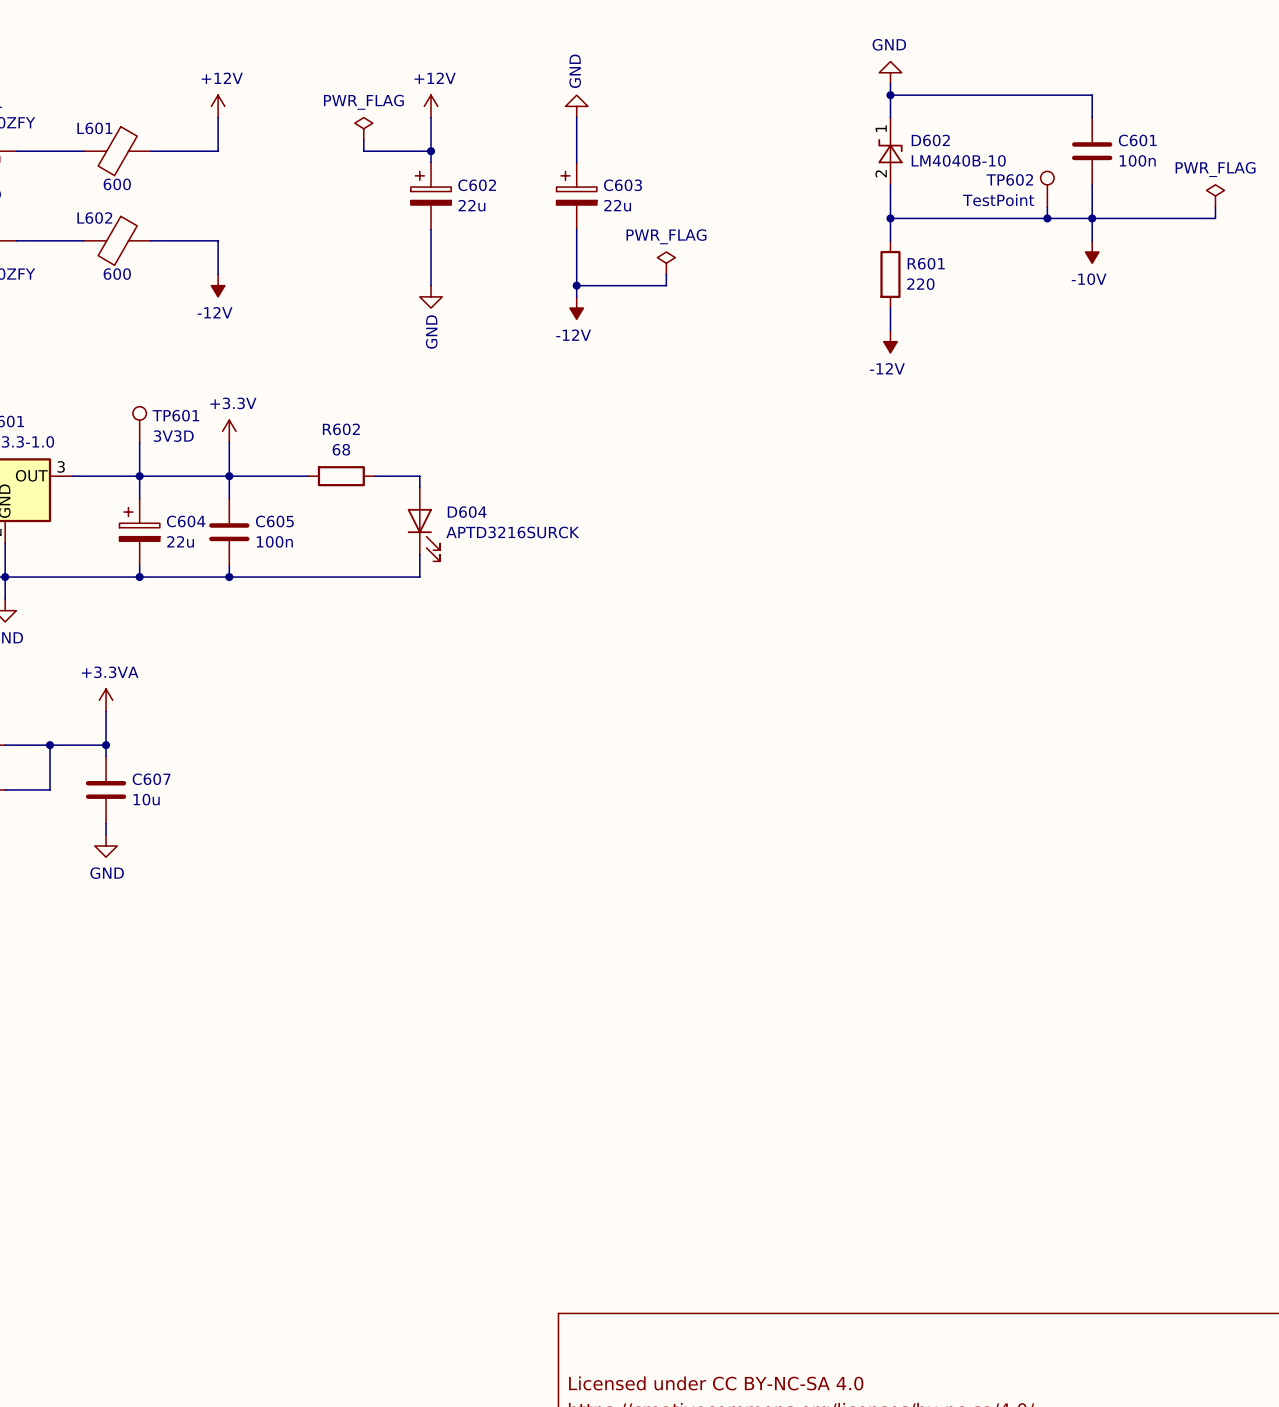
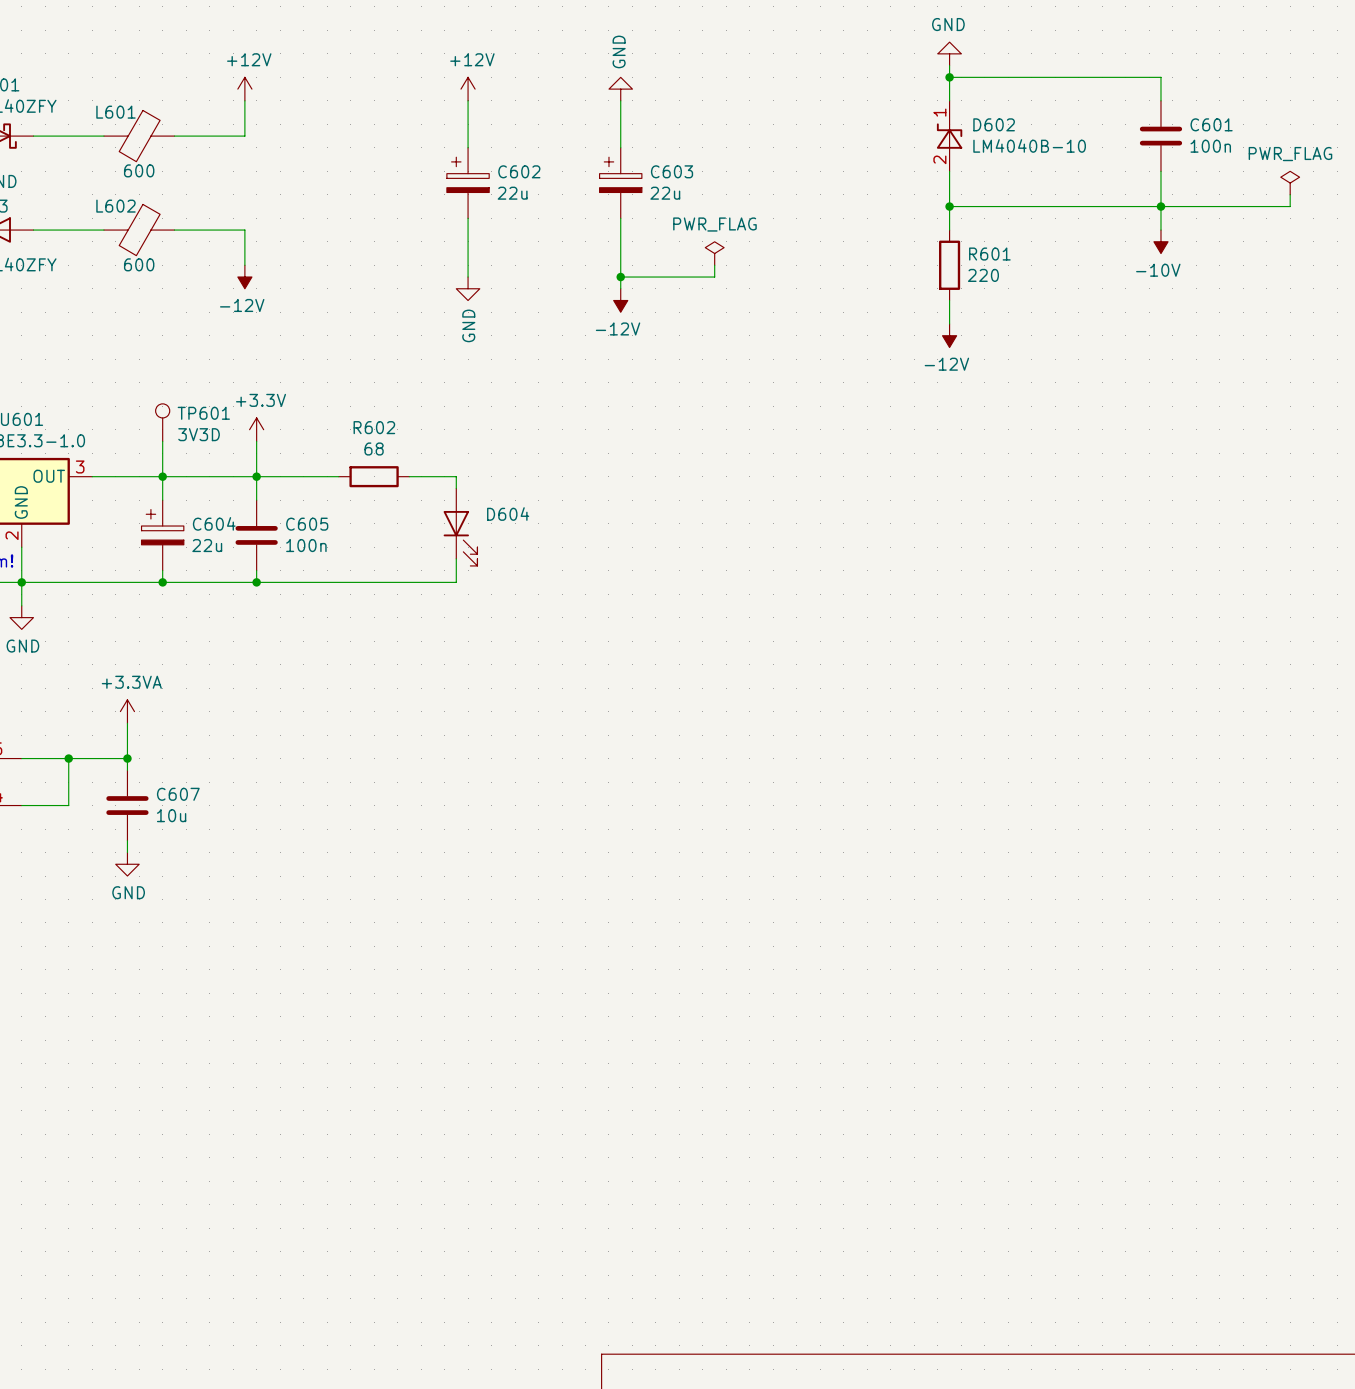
power symbol: PWR_FLAG (363, 128) -> none
wire: (363, 139) (363, 151) (431, 151) -> none
junction: (431, 151) -> none
TP602: TestPoint (1047, 189) -> none
wire: (1047, 207) (1047, 218) -> none
junction: (1047, 218) -> none
D604 value: APTD3216SURCK (512, 532) -> none

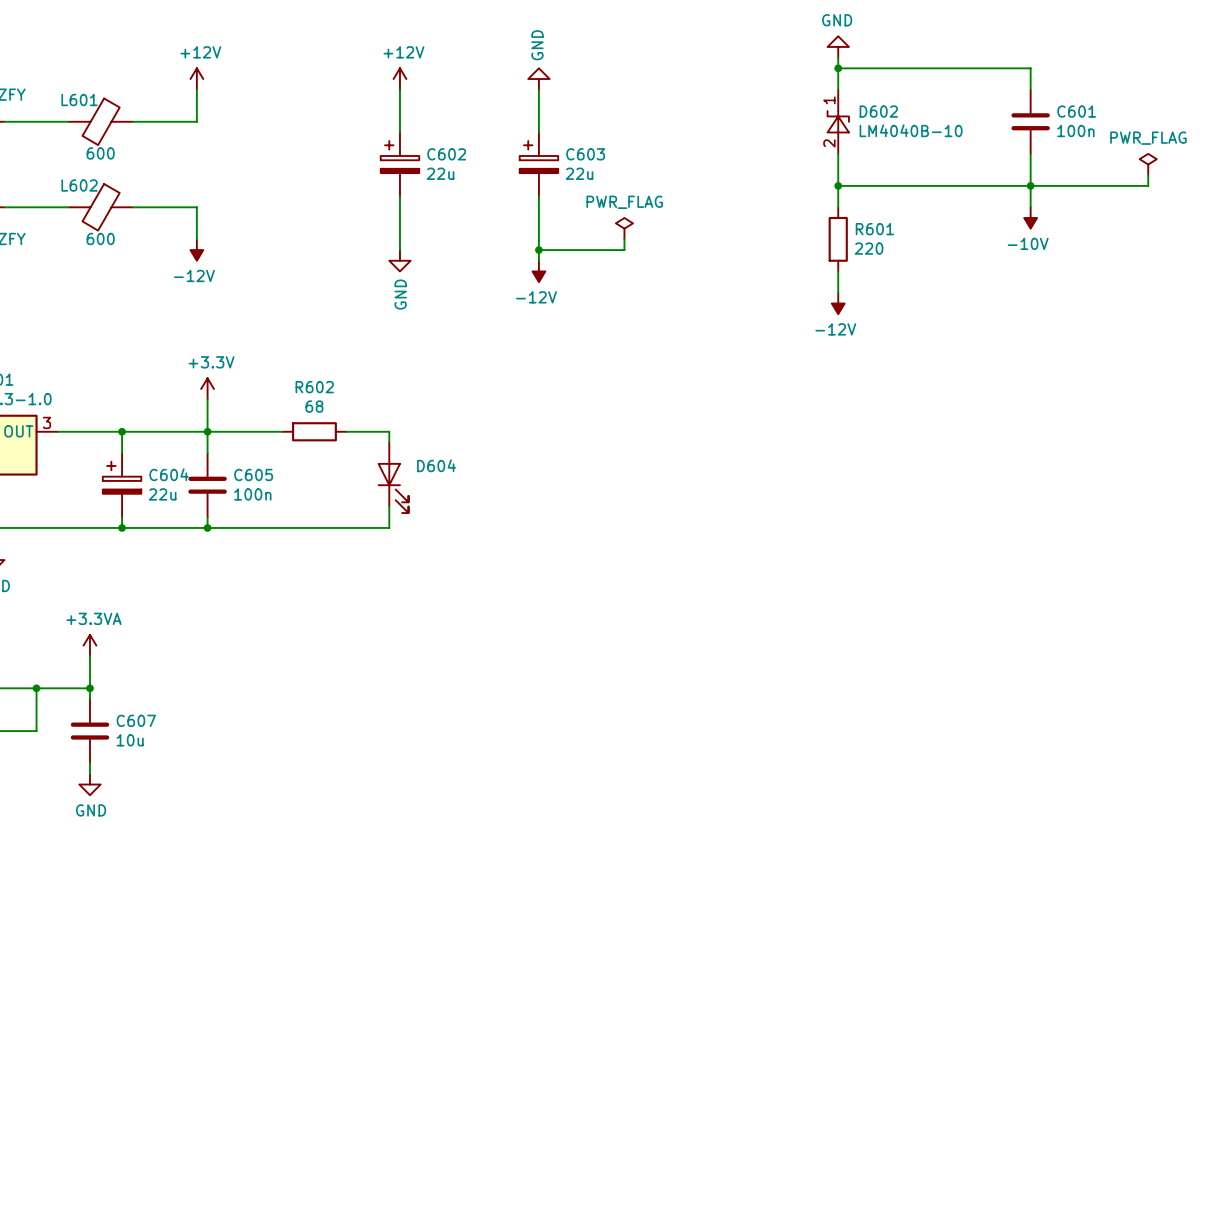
TP601: 3V3D (162, 422) -> none
wire: (162, 441) (162, 476) -> none

